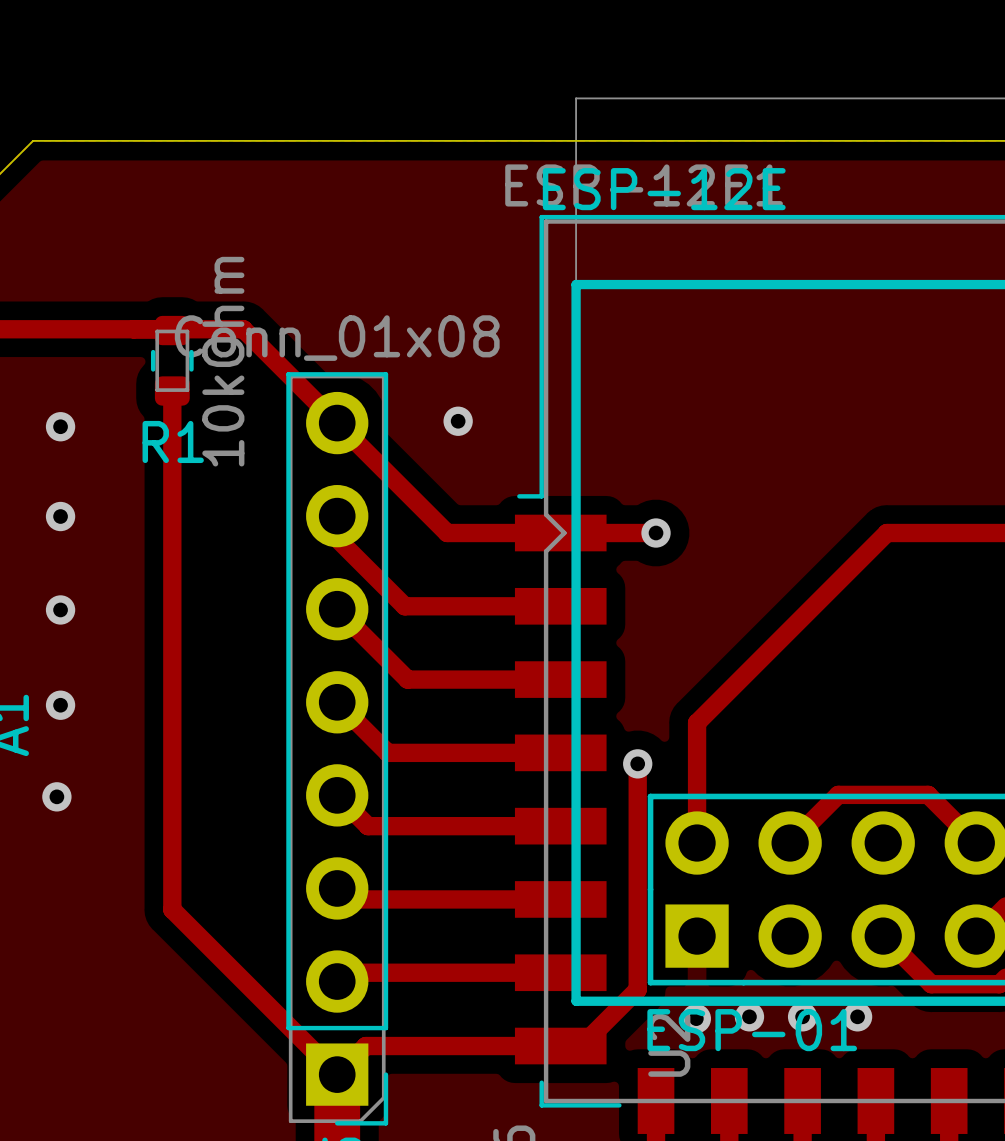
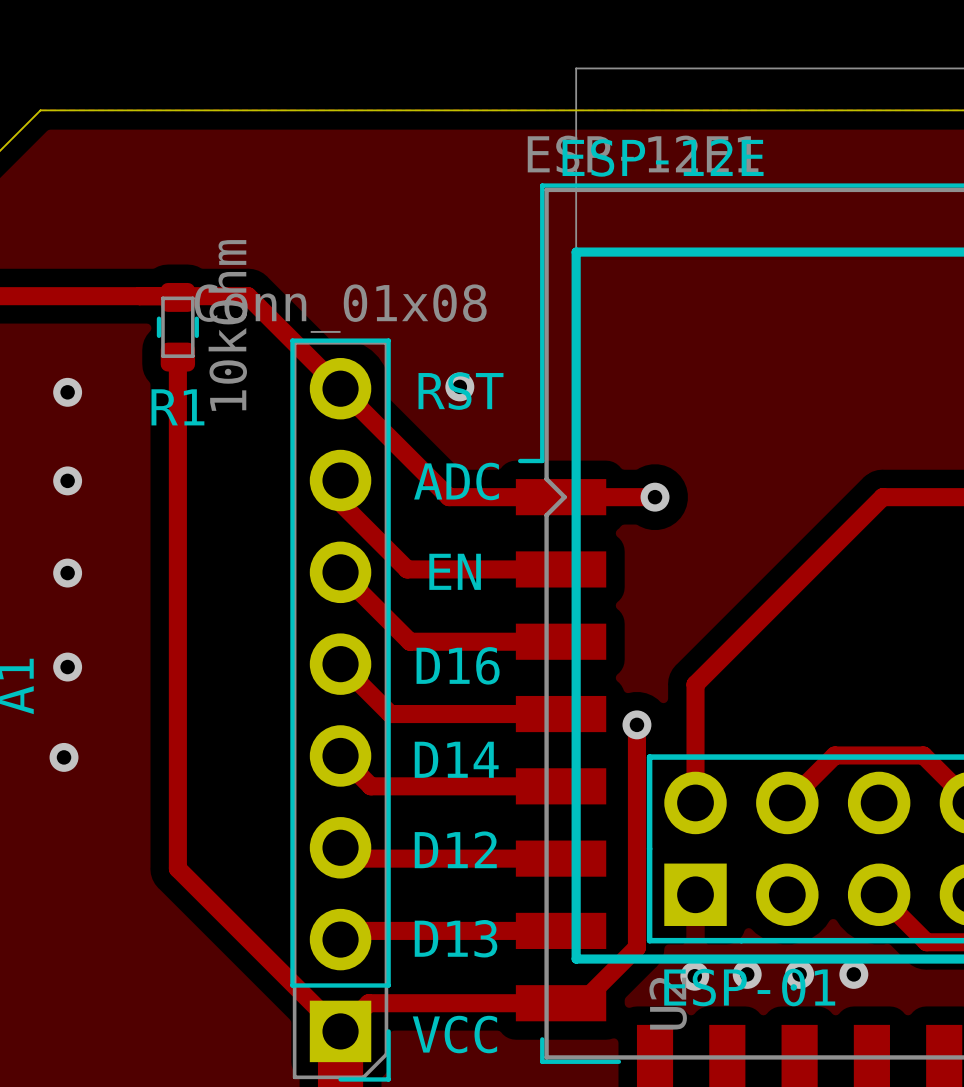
text: none -> RST (460, 391)
text: none -> ADC (456, 481)
text: none -> EN (455, 571)
text: none -> D16 (458, 665)
text: none -> D14 (456, 759)
text: none -> D12 (455, 849)
text: none -> D13 (456, 938)
text: none -> VCC (454, 1034)

